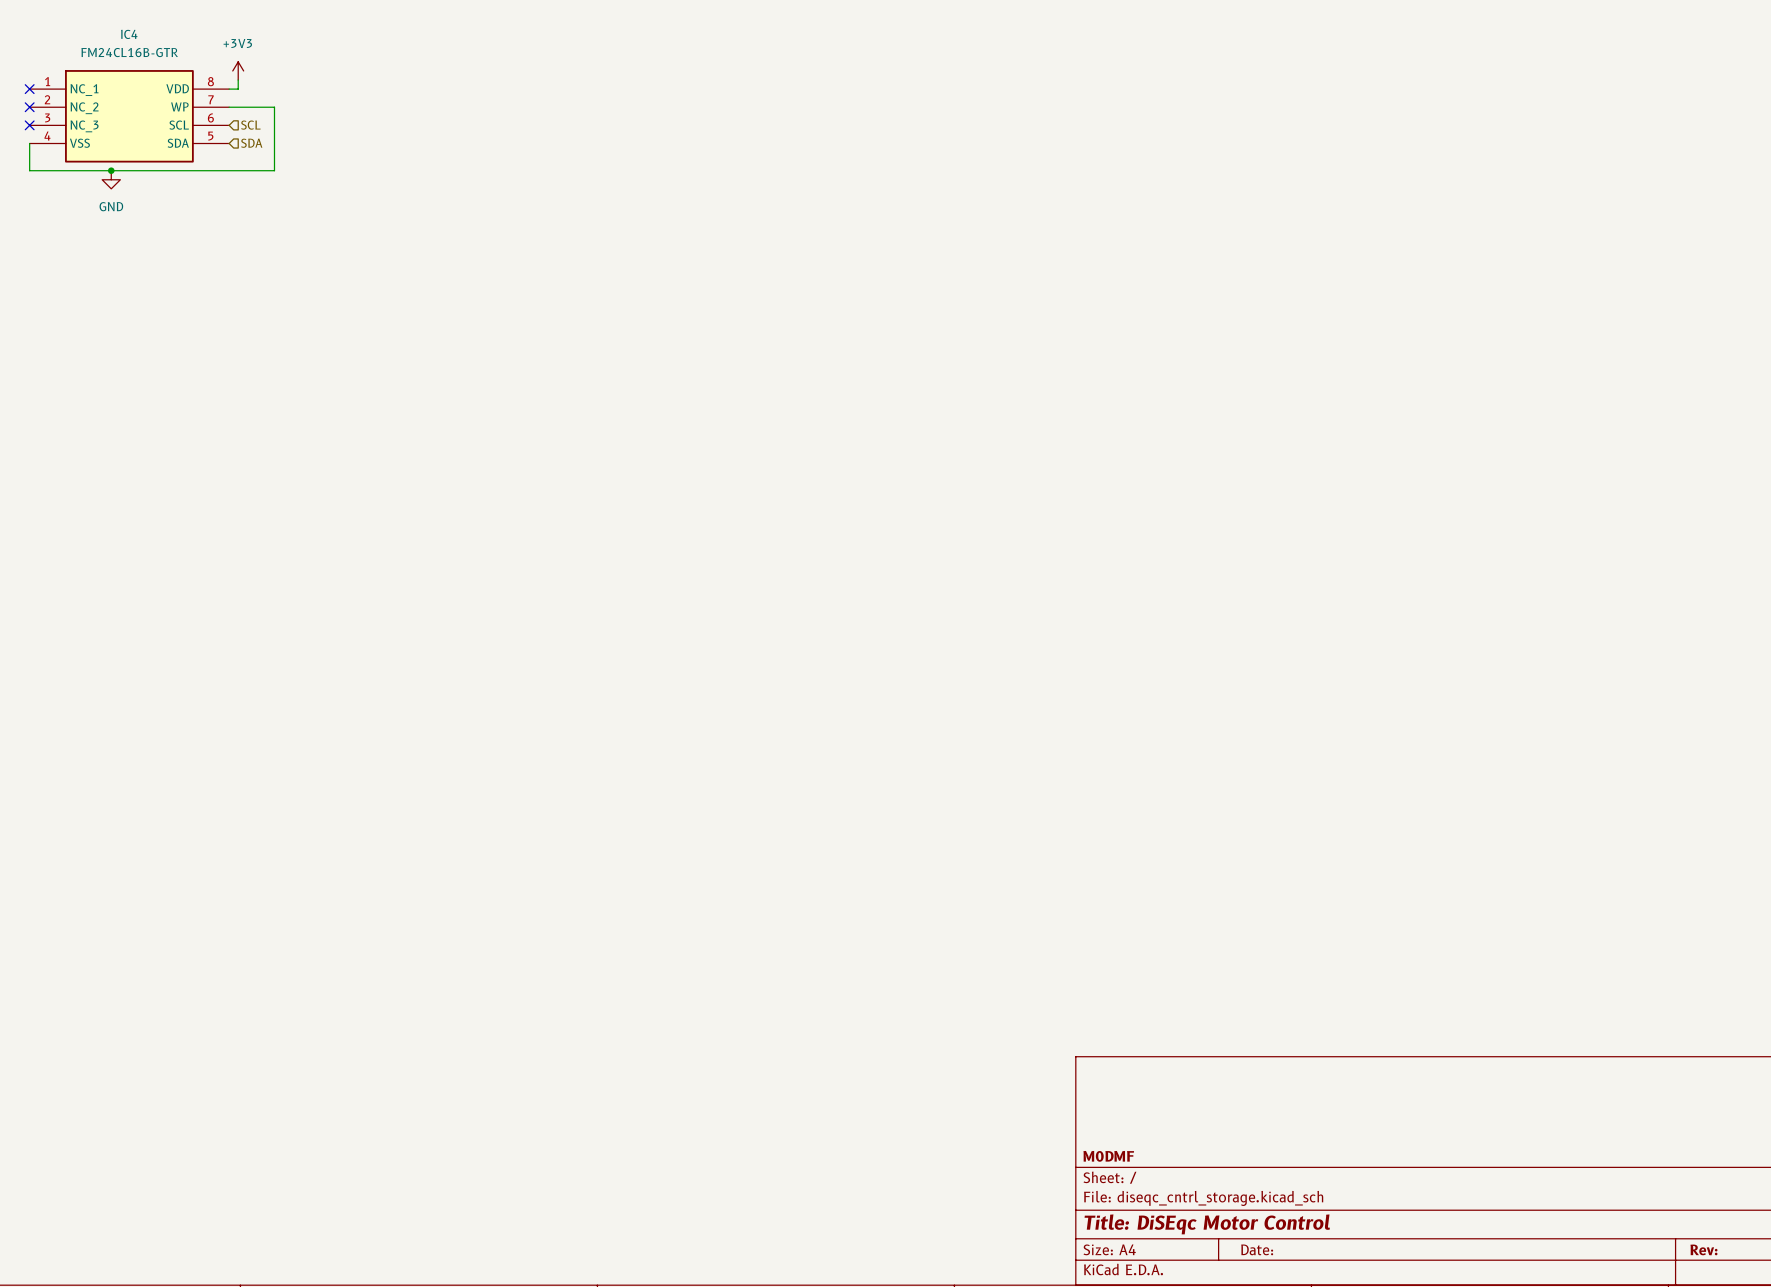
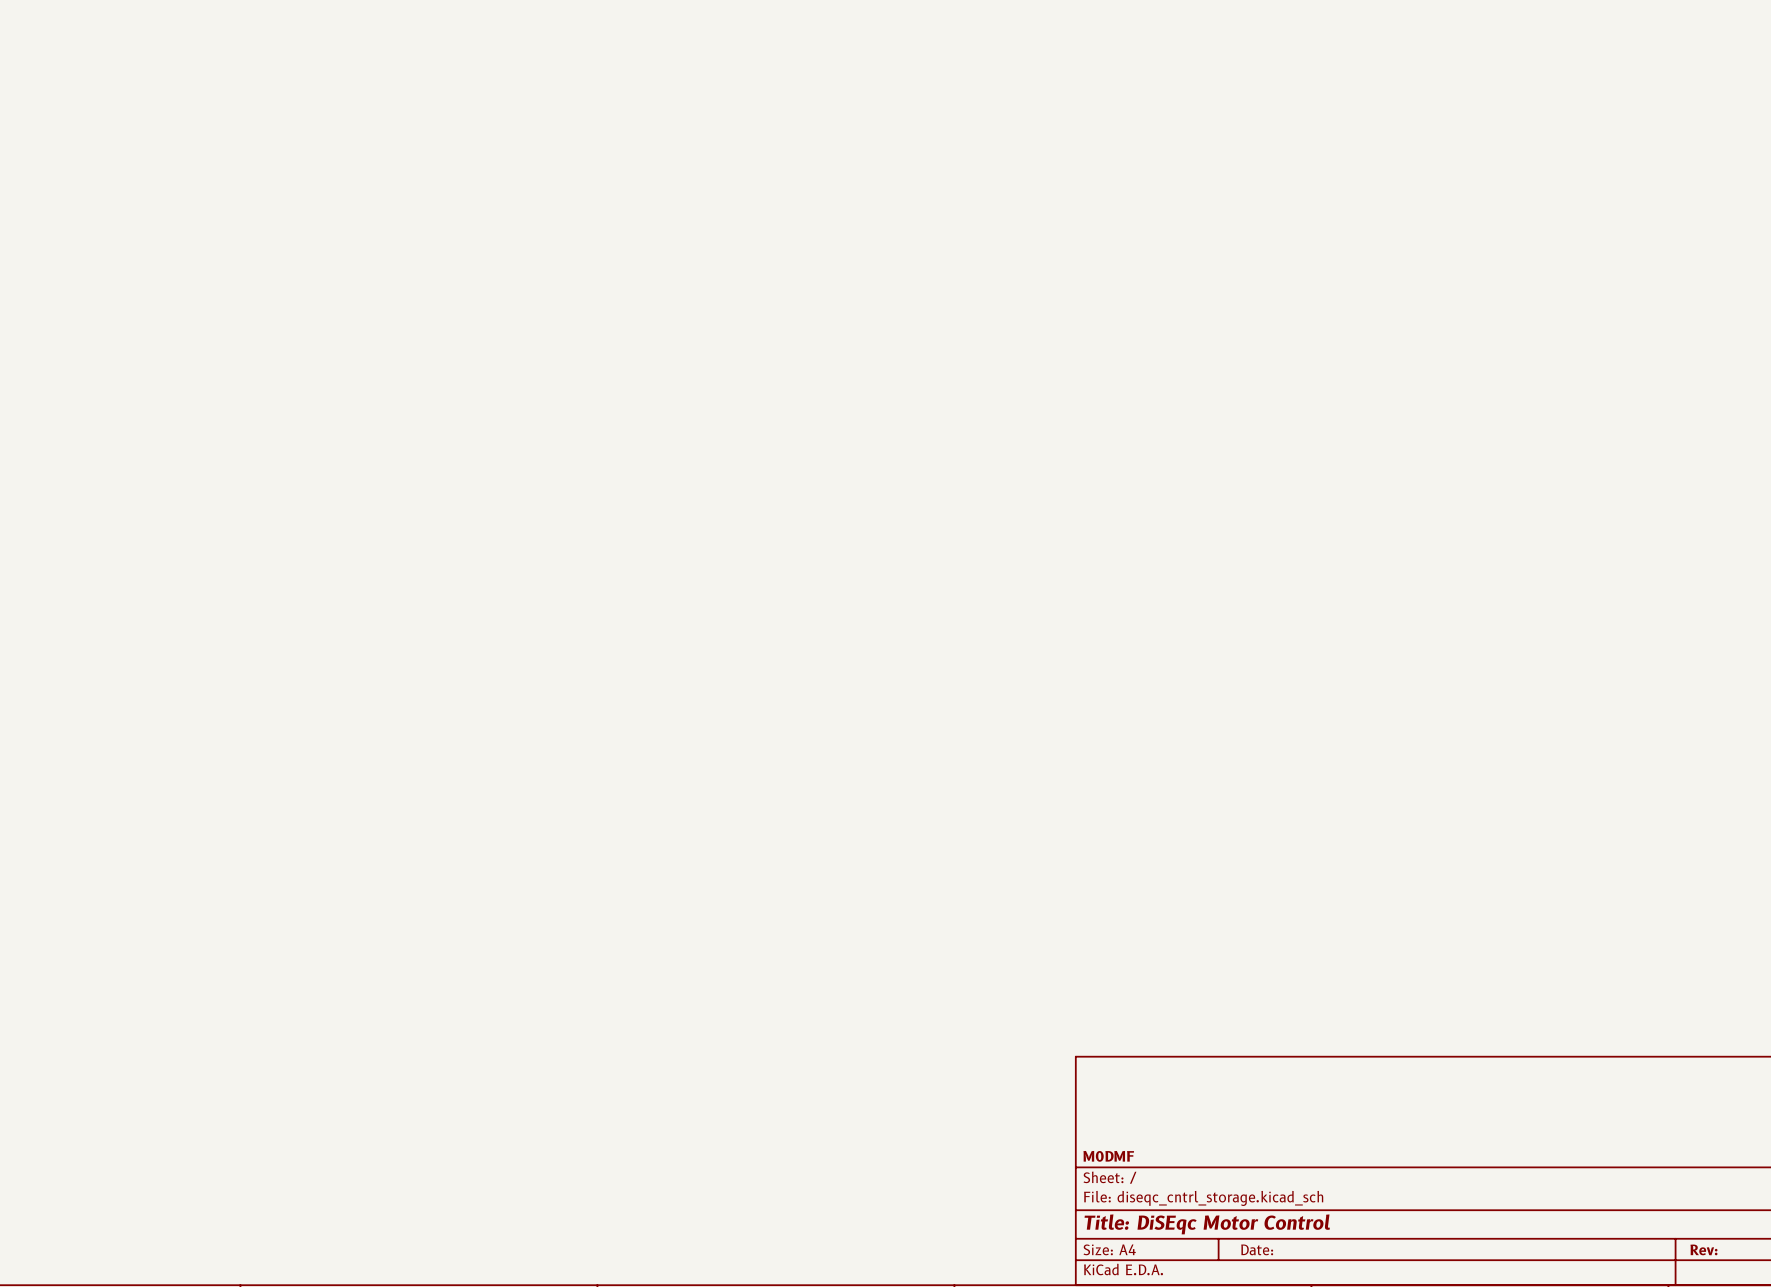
power symbol: +3V3 (238, 70) -> none
wire: (238, 80) (238, 89) (229, 89) -> none
no-connect mark: (29, 89) -> none
no-connect mark: (29, 107) -> none
wire: (229, 107) (274, 107) (274, 170) (29, 170) (29, 143) -> none
IC4: FM24CL16B-GTR (129, 116) -> none
no-connect mark: (29, 125) -> none
hierarchical label: SCL (250, 125) -> none
hierarchical label: SDA (251, 143) -> none
junction: (111, 170) -> none
power symbol: GND (111, 179) -> none

